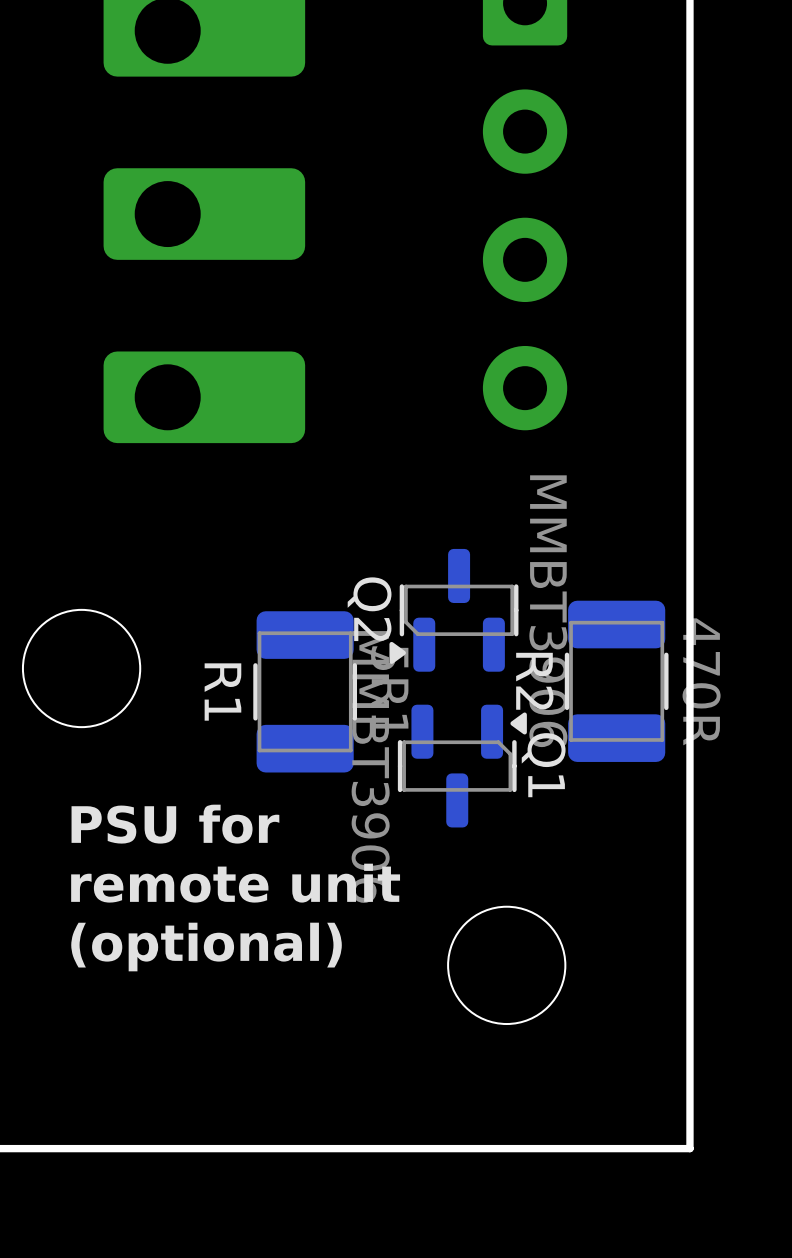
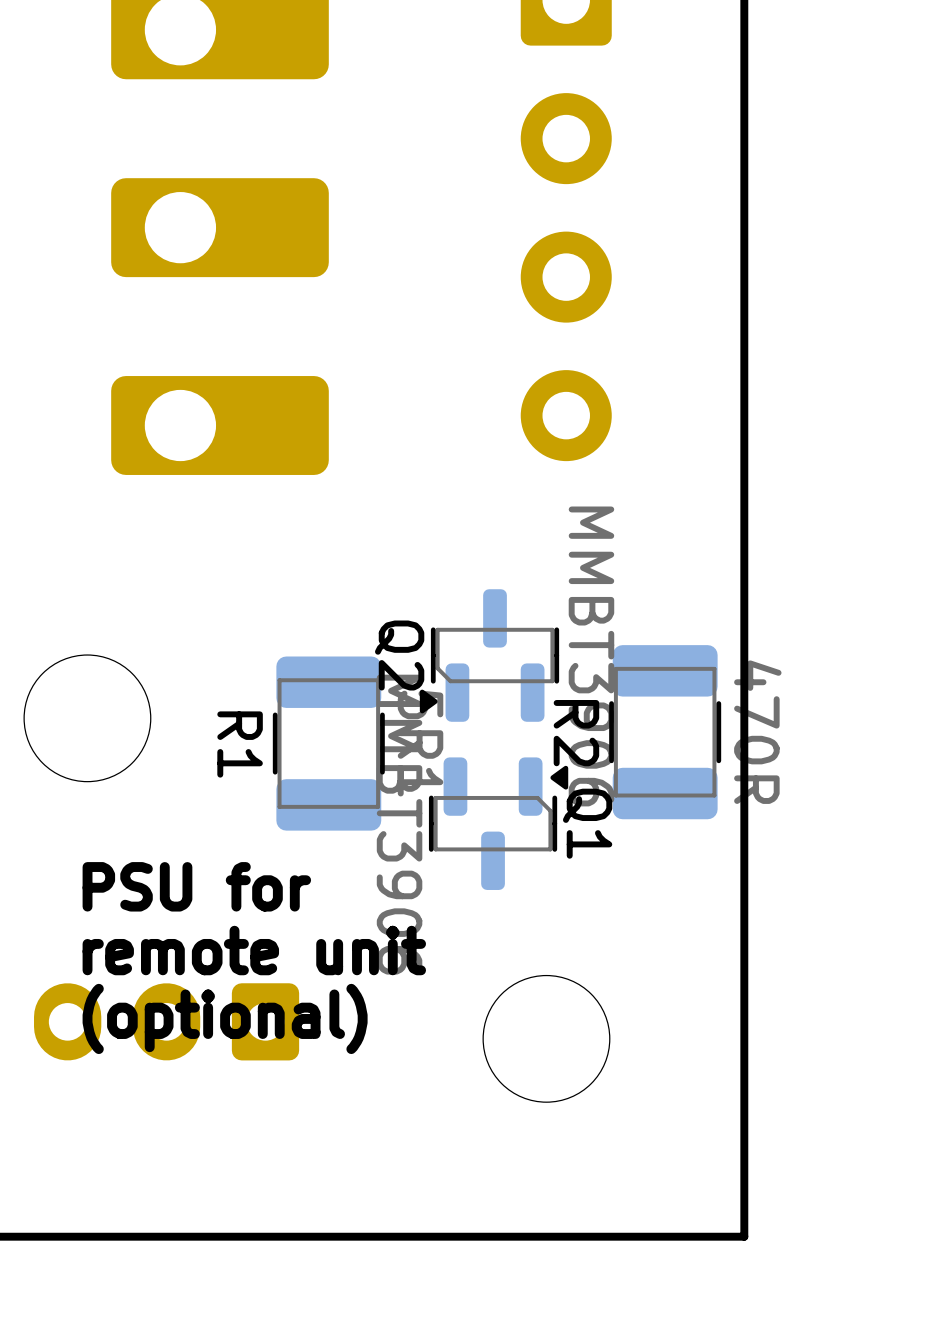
part: none -> (166, 1021)

